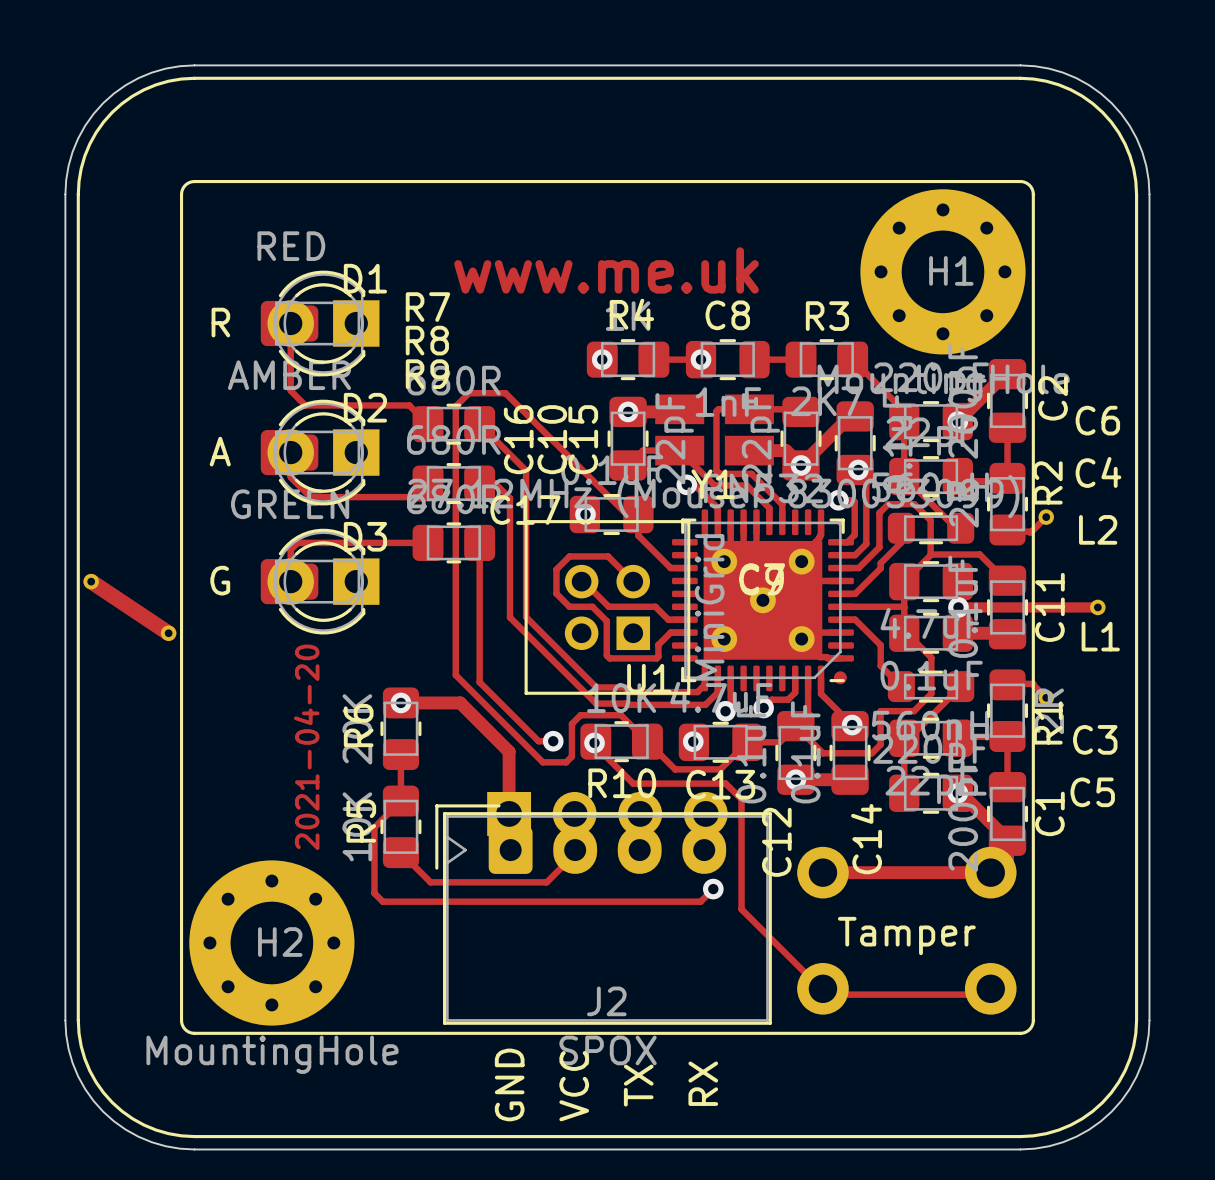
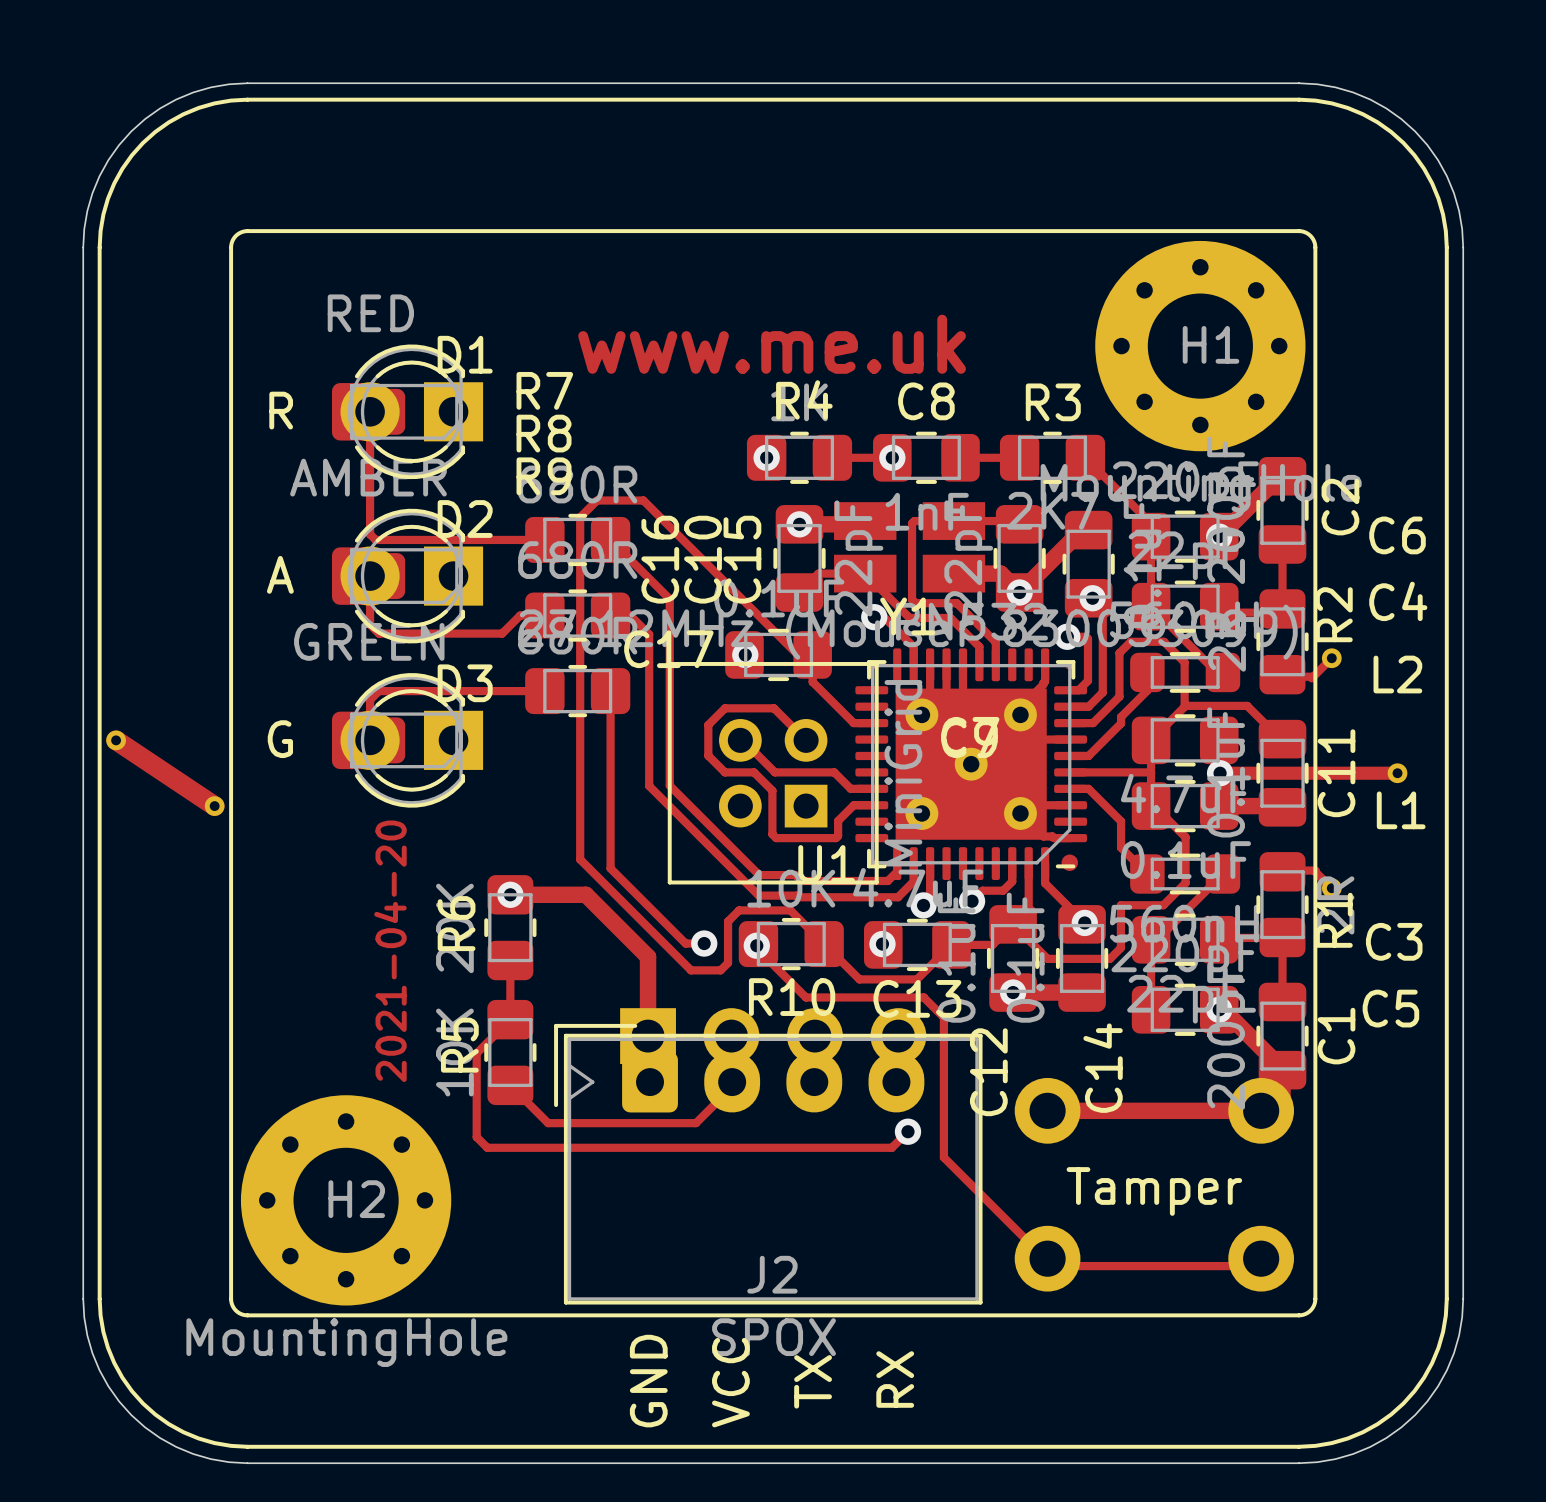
track: (290, 390) (305, 405) (409, 405) (428, 424) -> (370, 497) (370, 534) (375, 539) (544, 539)
track: (290, 477) (310, 497) (414, 497) (428, 483) -> (370, 607) (370, 624) (378, 633) (502, 633) (520, 615) (544, 615)

